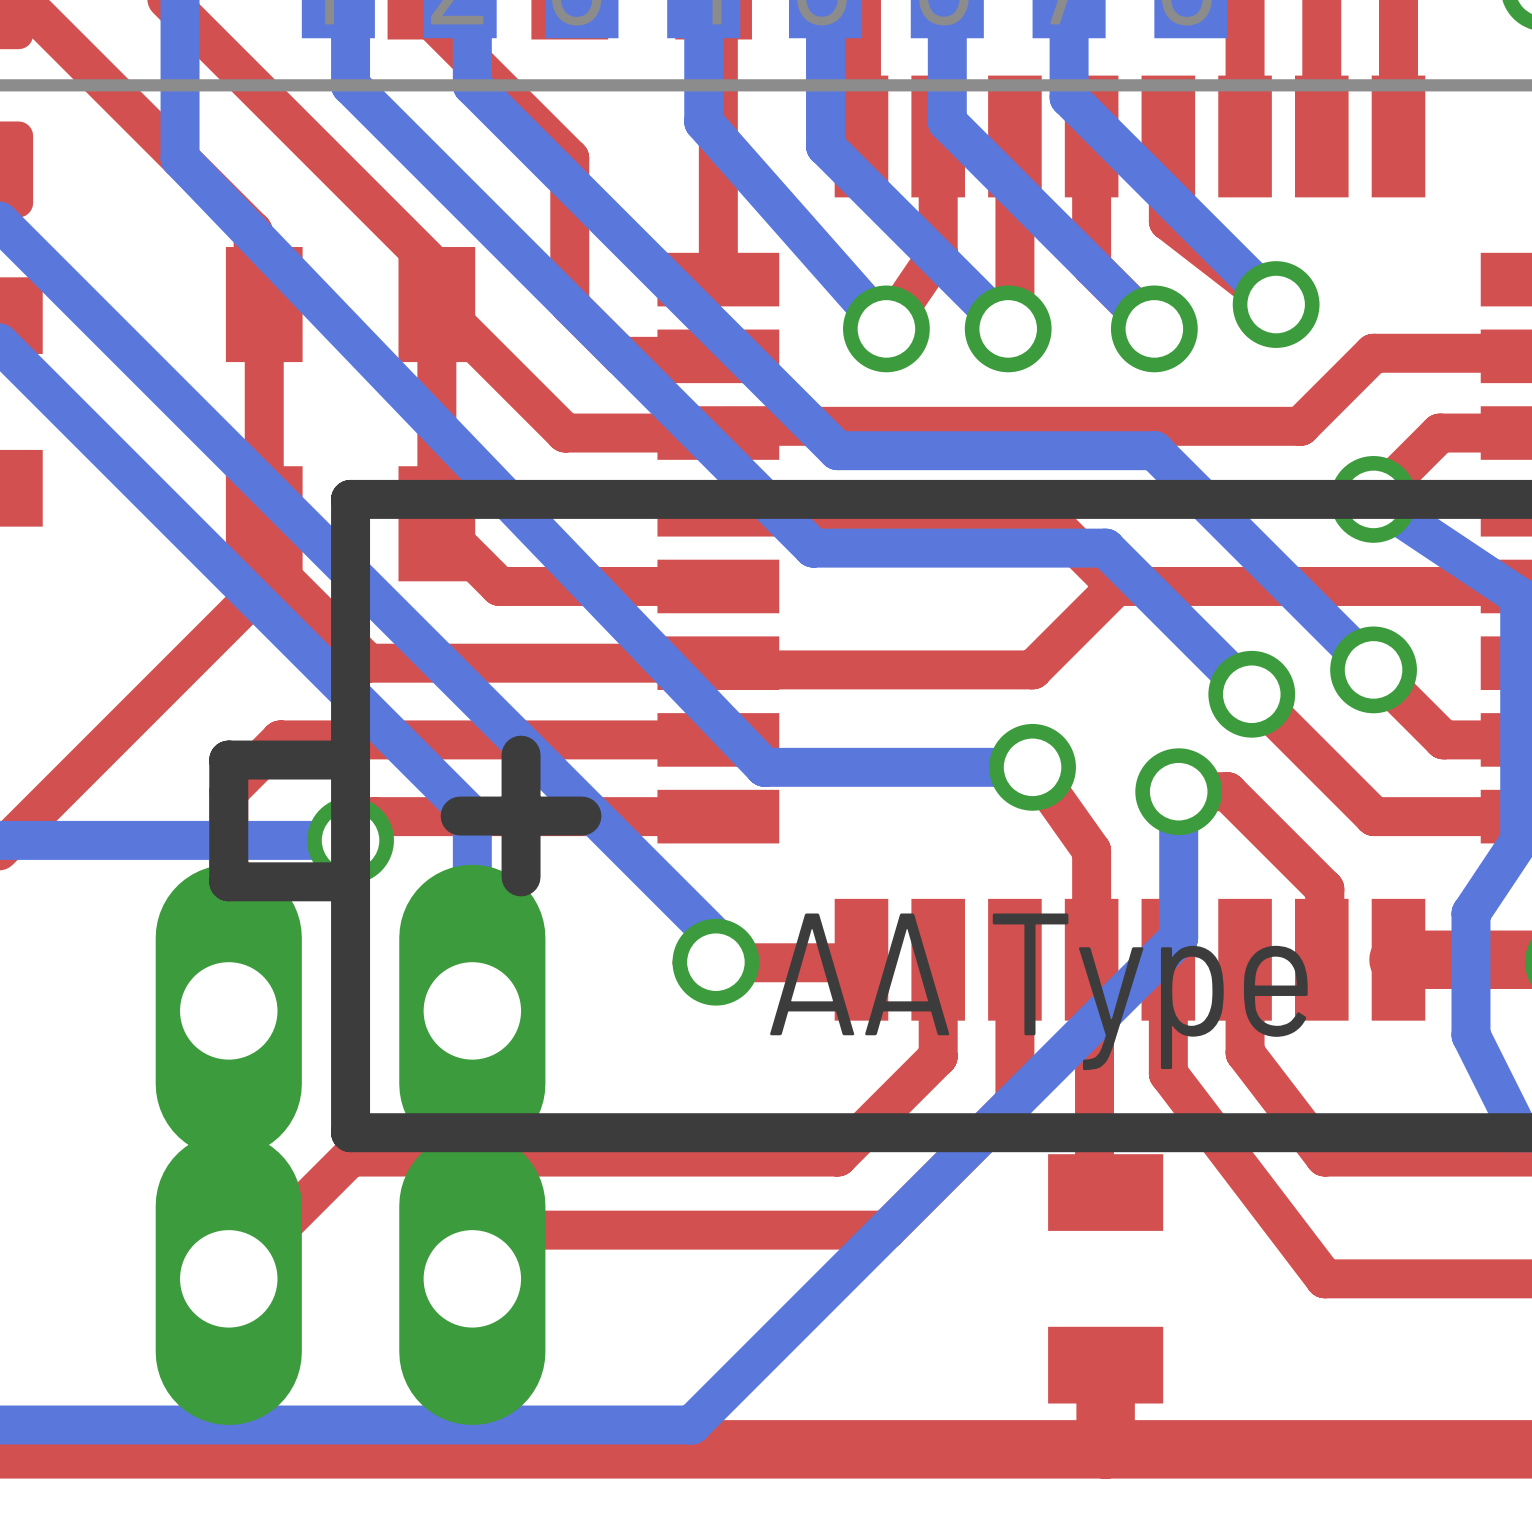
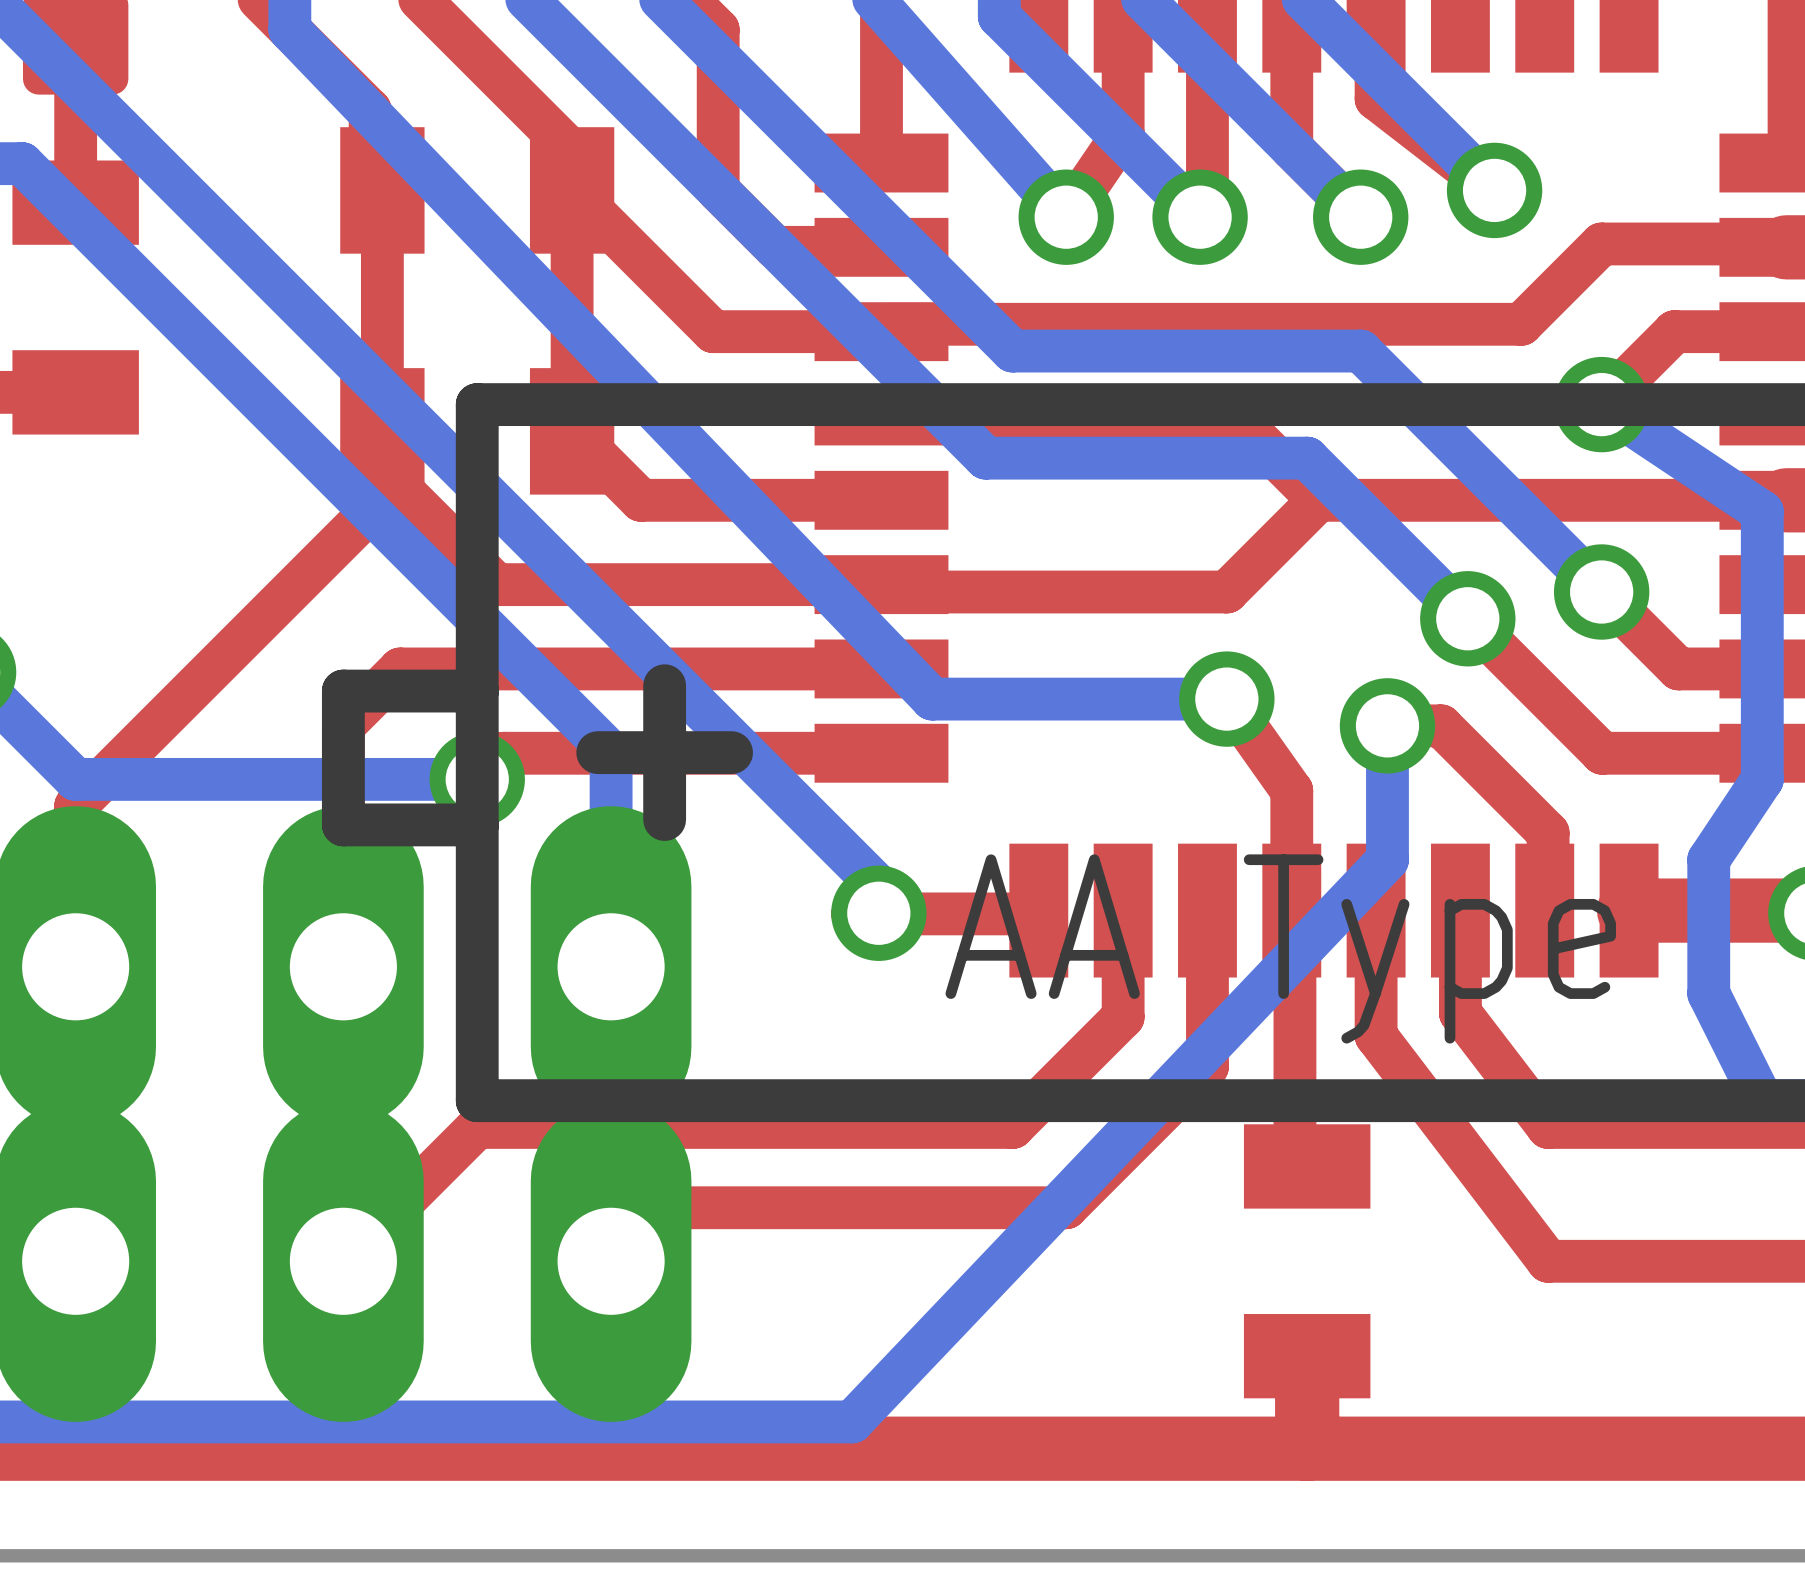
bottom track: (1178, 913) (1178, 937) (691, 1424) -> (1387, 859) (852, 1421)

